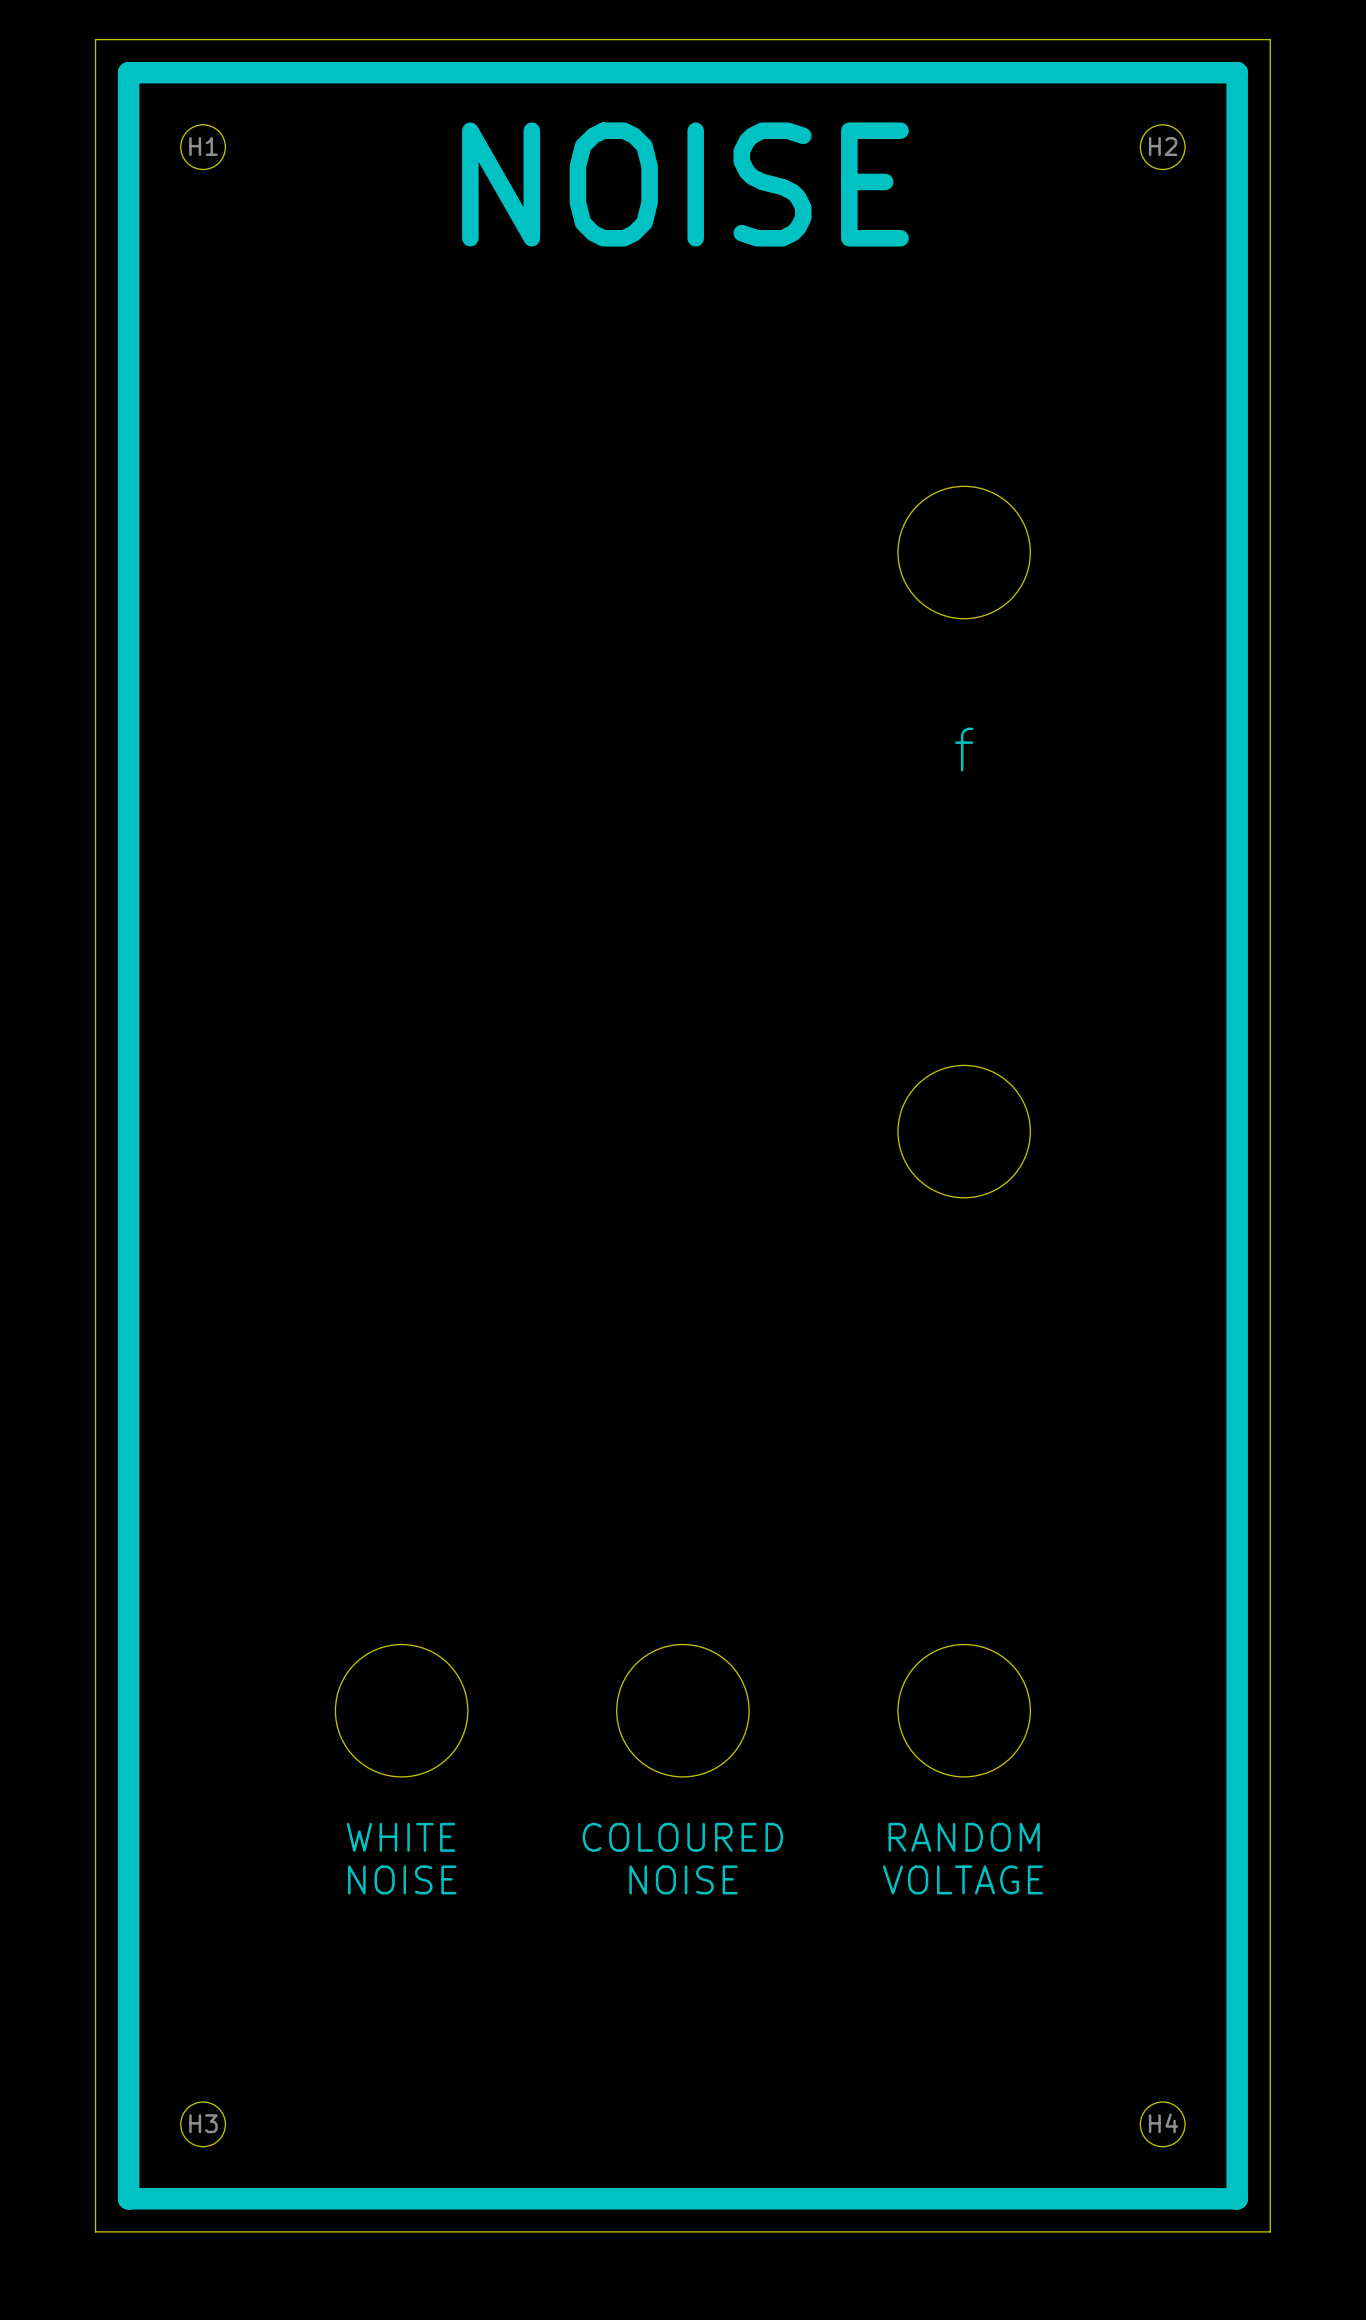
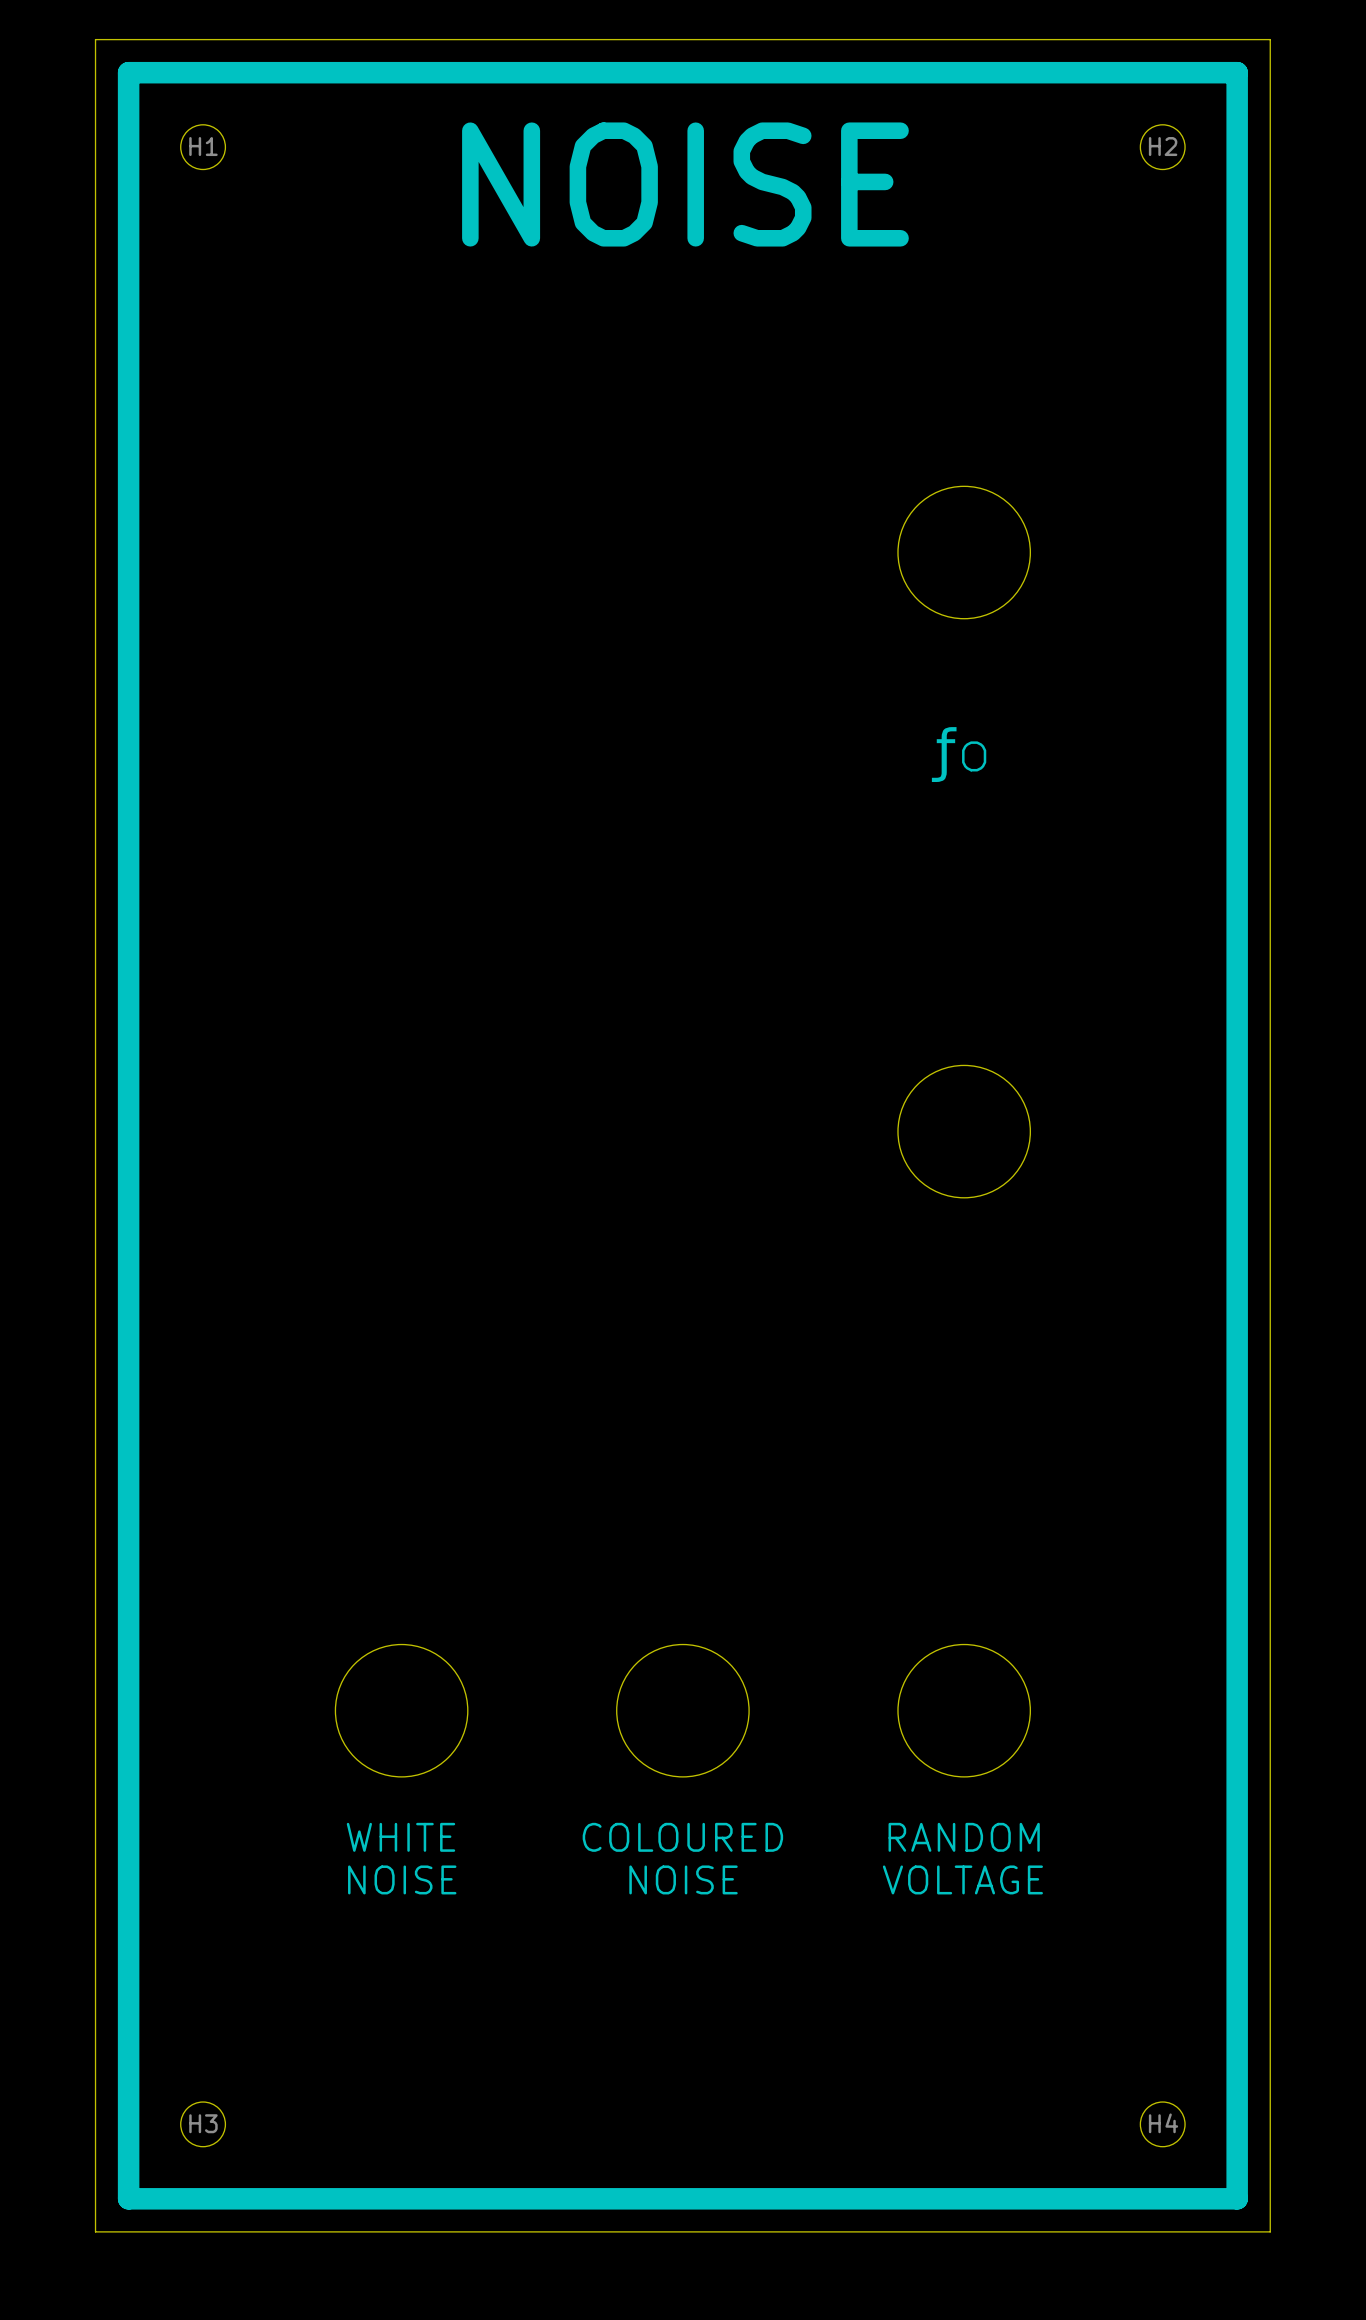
text: f (964, 749) -> ƒo (958, 754)

